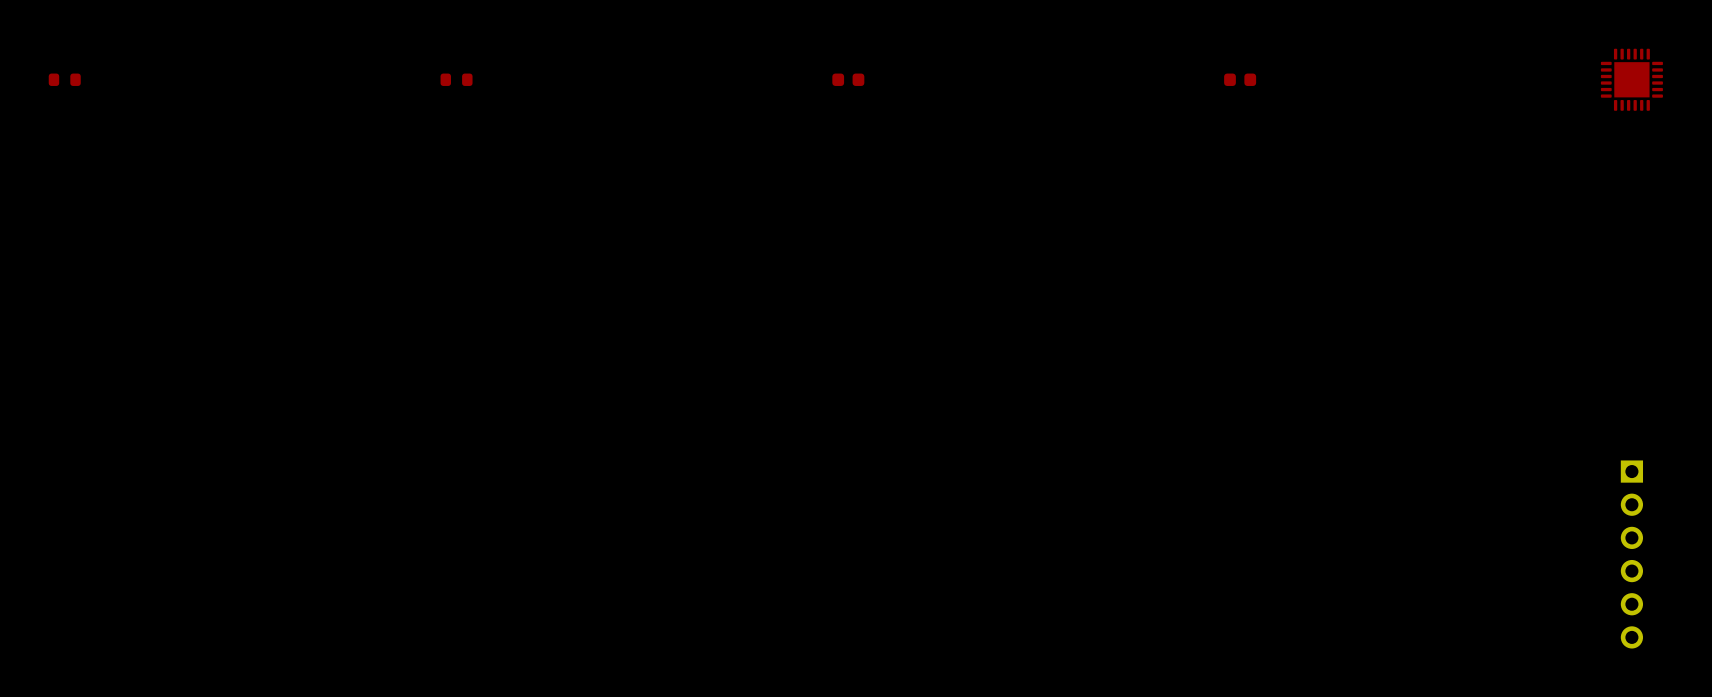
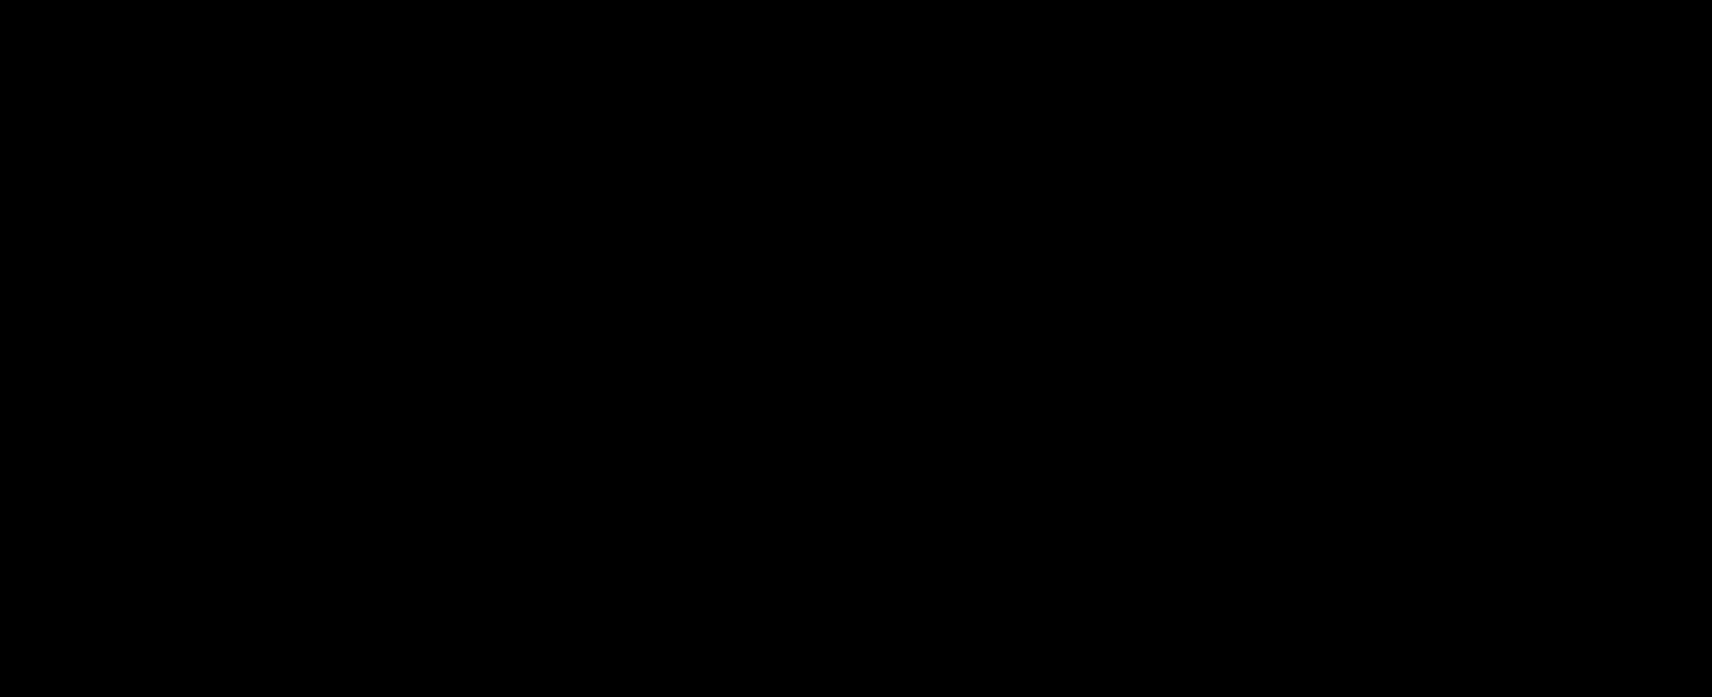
part: (64, 79) -> none
part: (456, 79) -> none
part: (848, 79) -> none
part: (1240, 79) -> none
part: (1631, 79) -> none
part: (1631, 554) -> none

